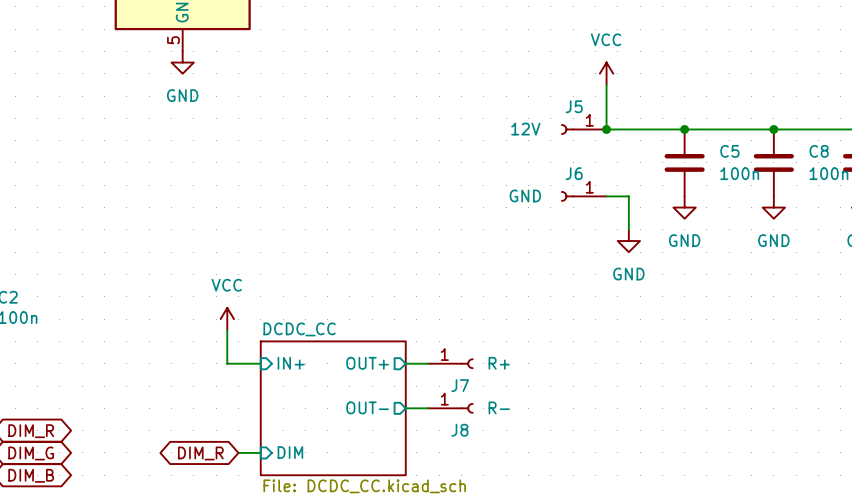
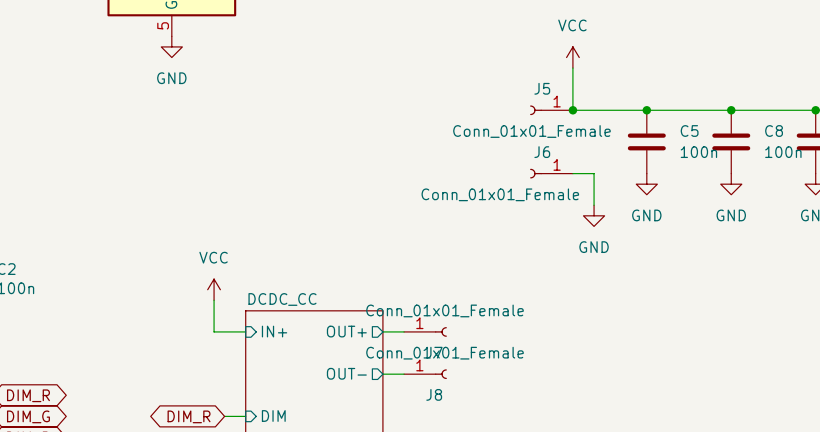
J5 value: 12V (525, 129) -> Conn_01x01_Female (531, 131)
J6 value: GND (525, 195) -> Conn_01x01_Female (500, 194)
J7 value: R+ (499, 363) -> Conn_01x01_Female (445, 310)
J8 value: R- (499, 407) -> Conn_01x01_Female (445, 353)

